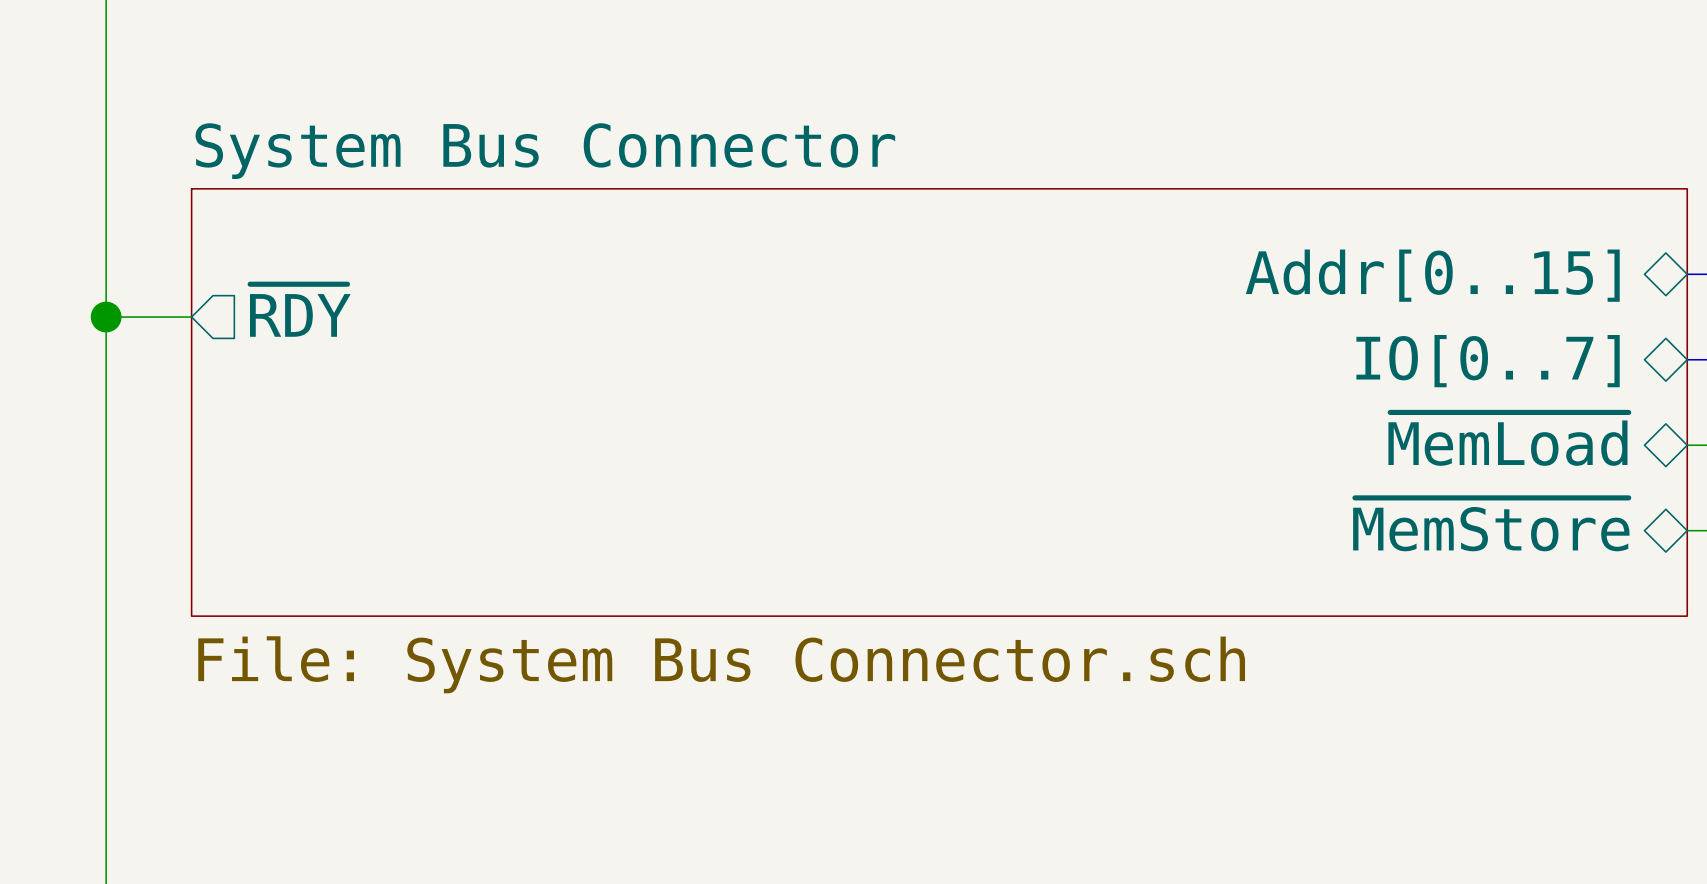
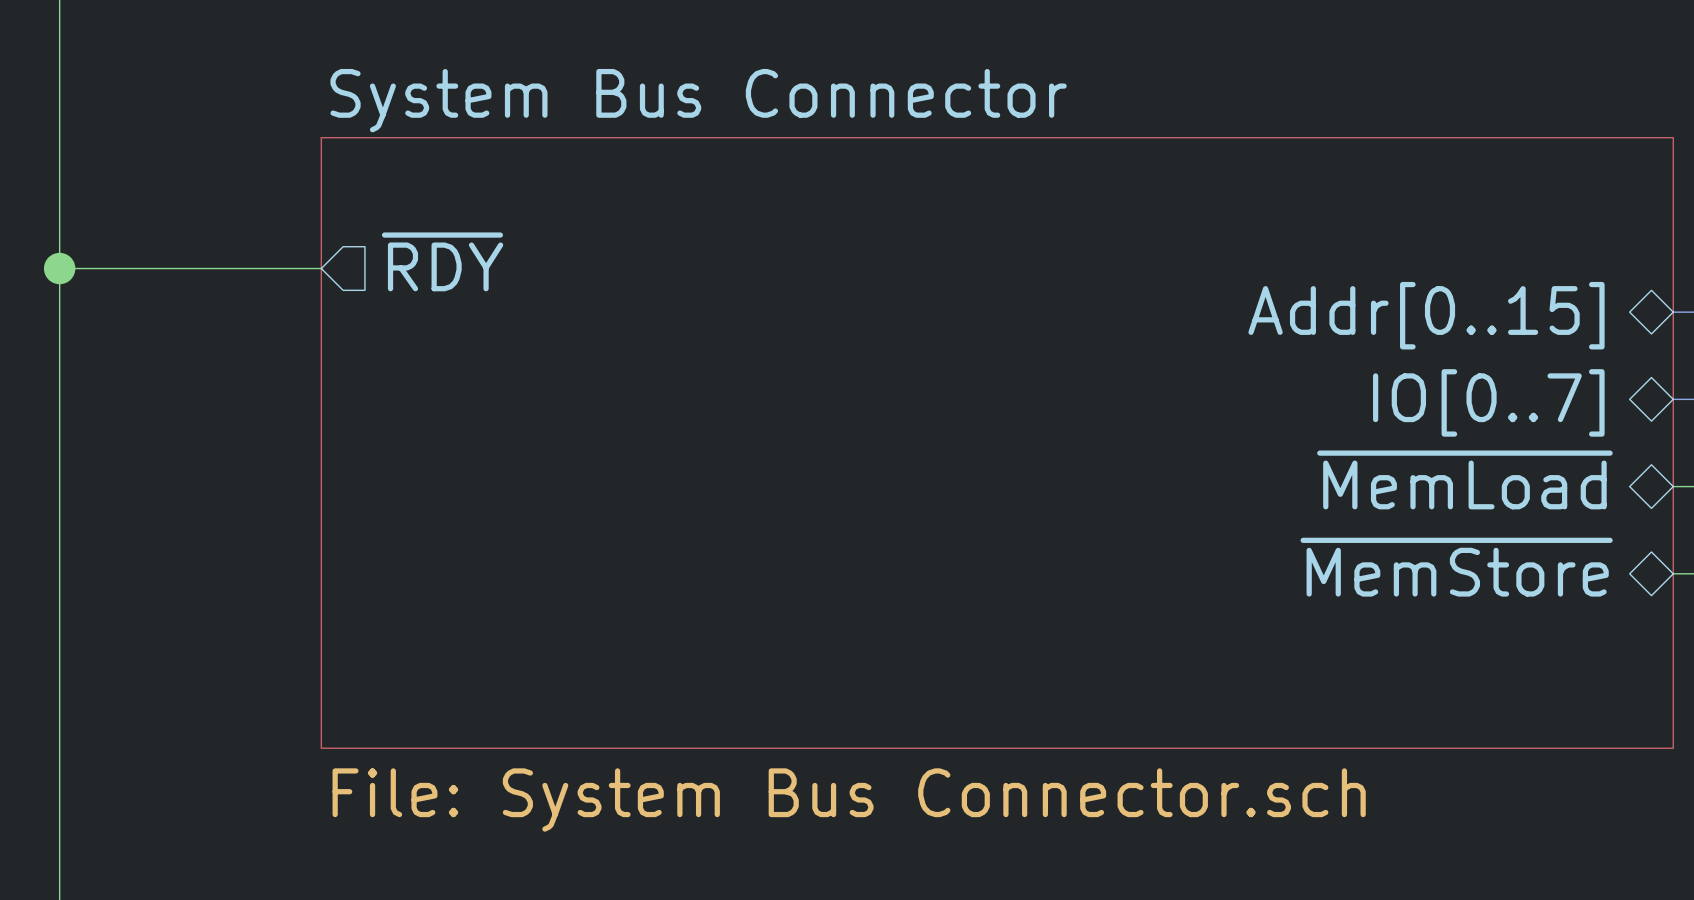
wire: none -> (59, 268) (321, 268)
sheet pin position: ~{RDY} (300, 310) -> ~{RDY} (442, 261)
wire: (106, 317) (191, 317) -> none
junction position: (106, 317) -> (59, 268)
sheet System Bus Connector: File: System Bus Connector.sch (939, 402) -> none
sheet System Bus Connector: none -> File: System Bus Connector.sch (997, 442)

